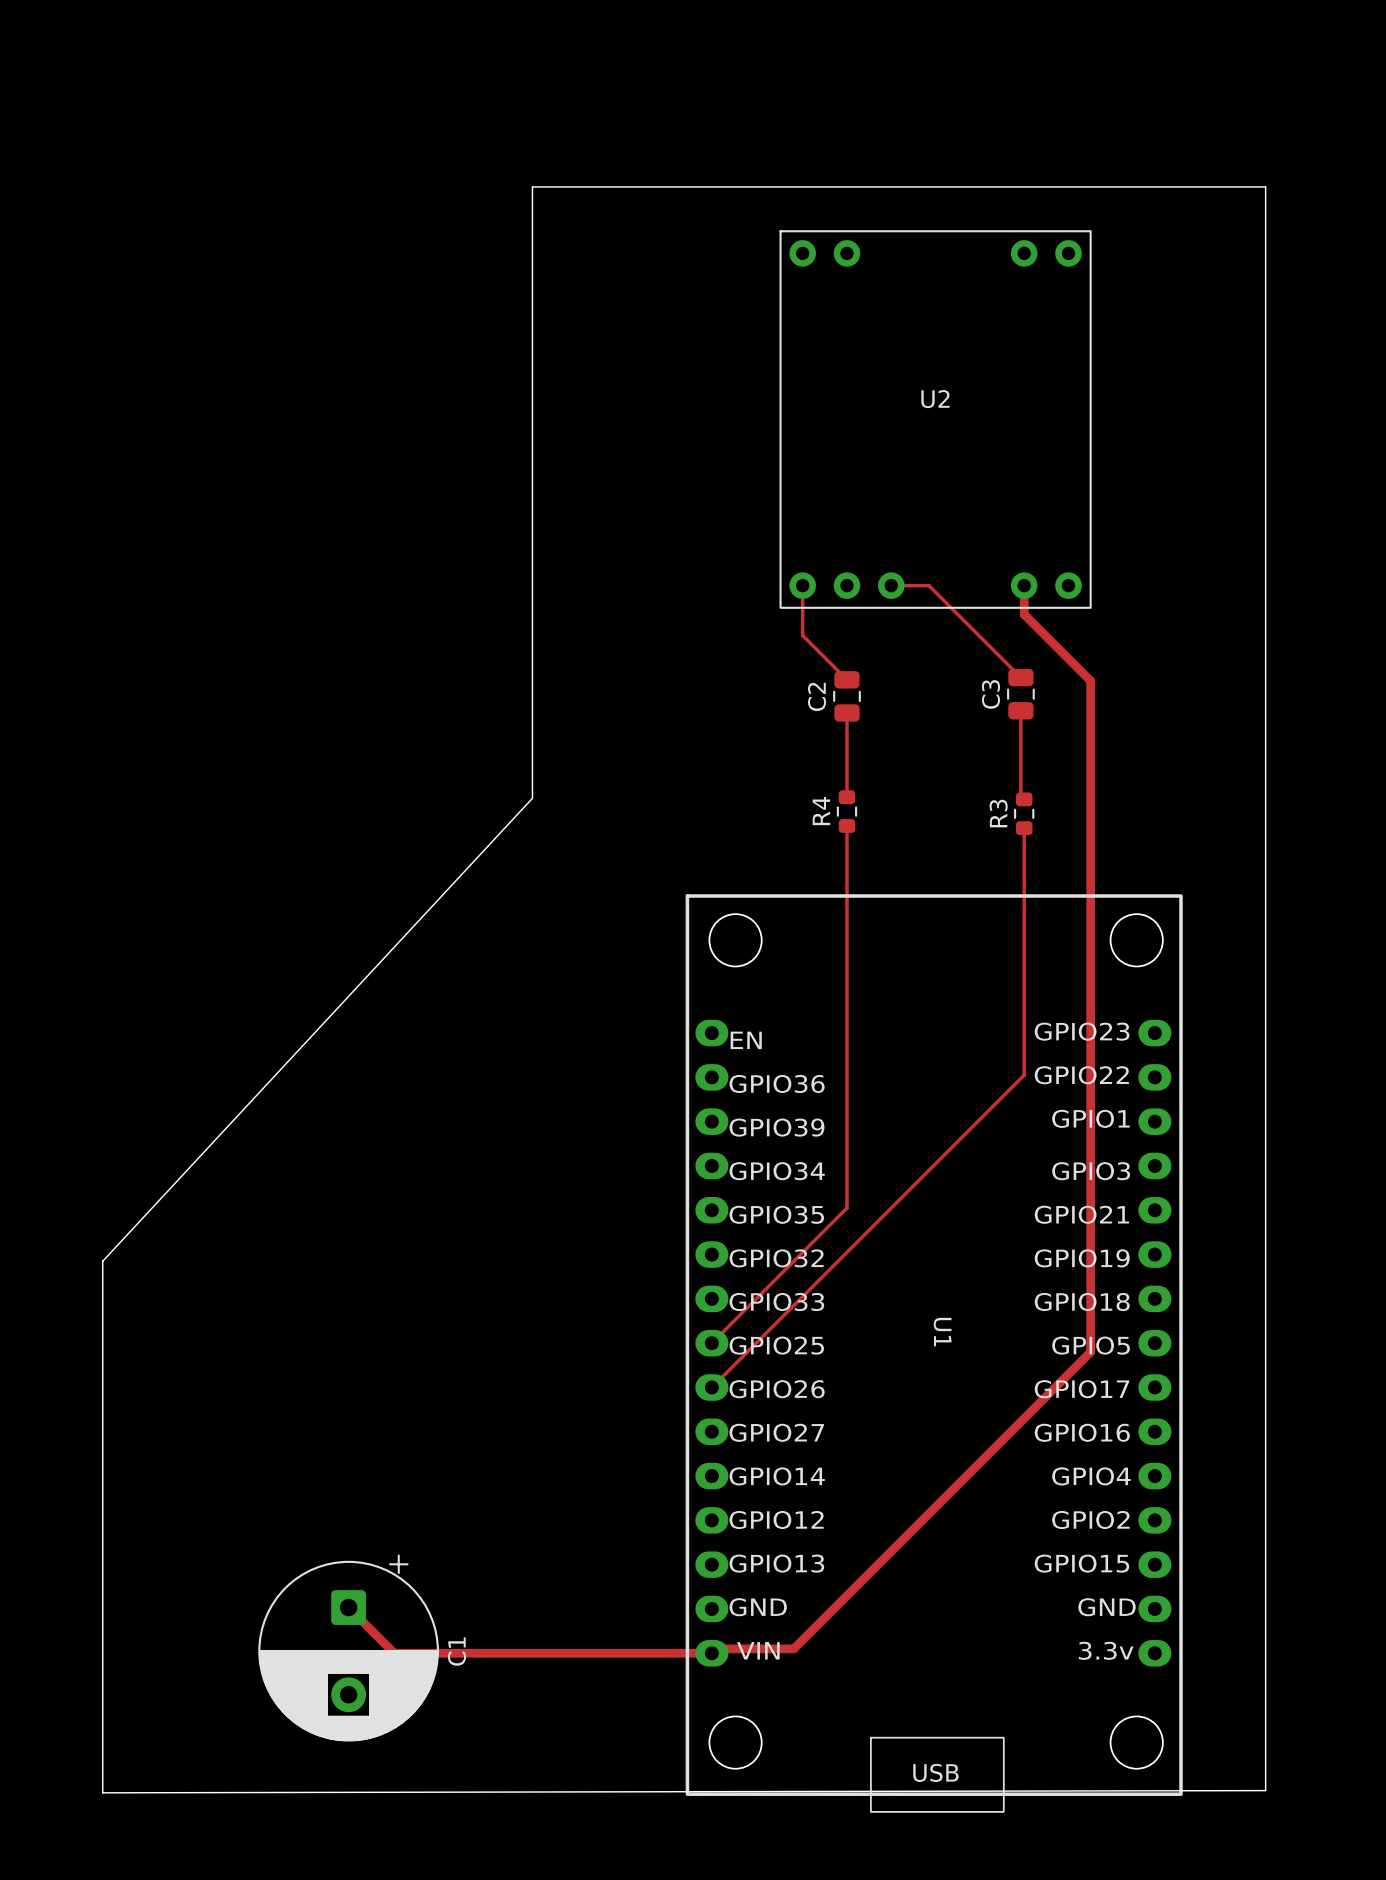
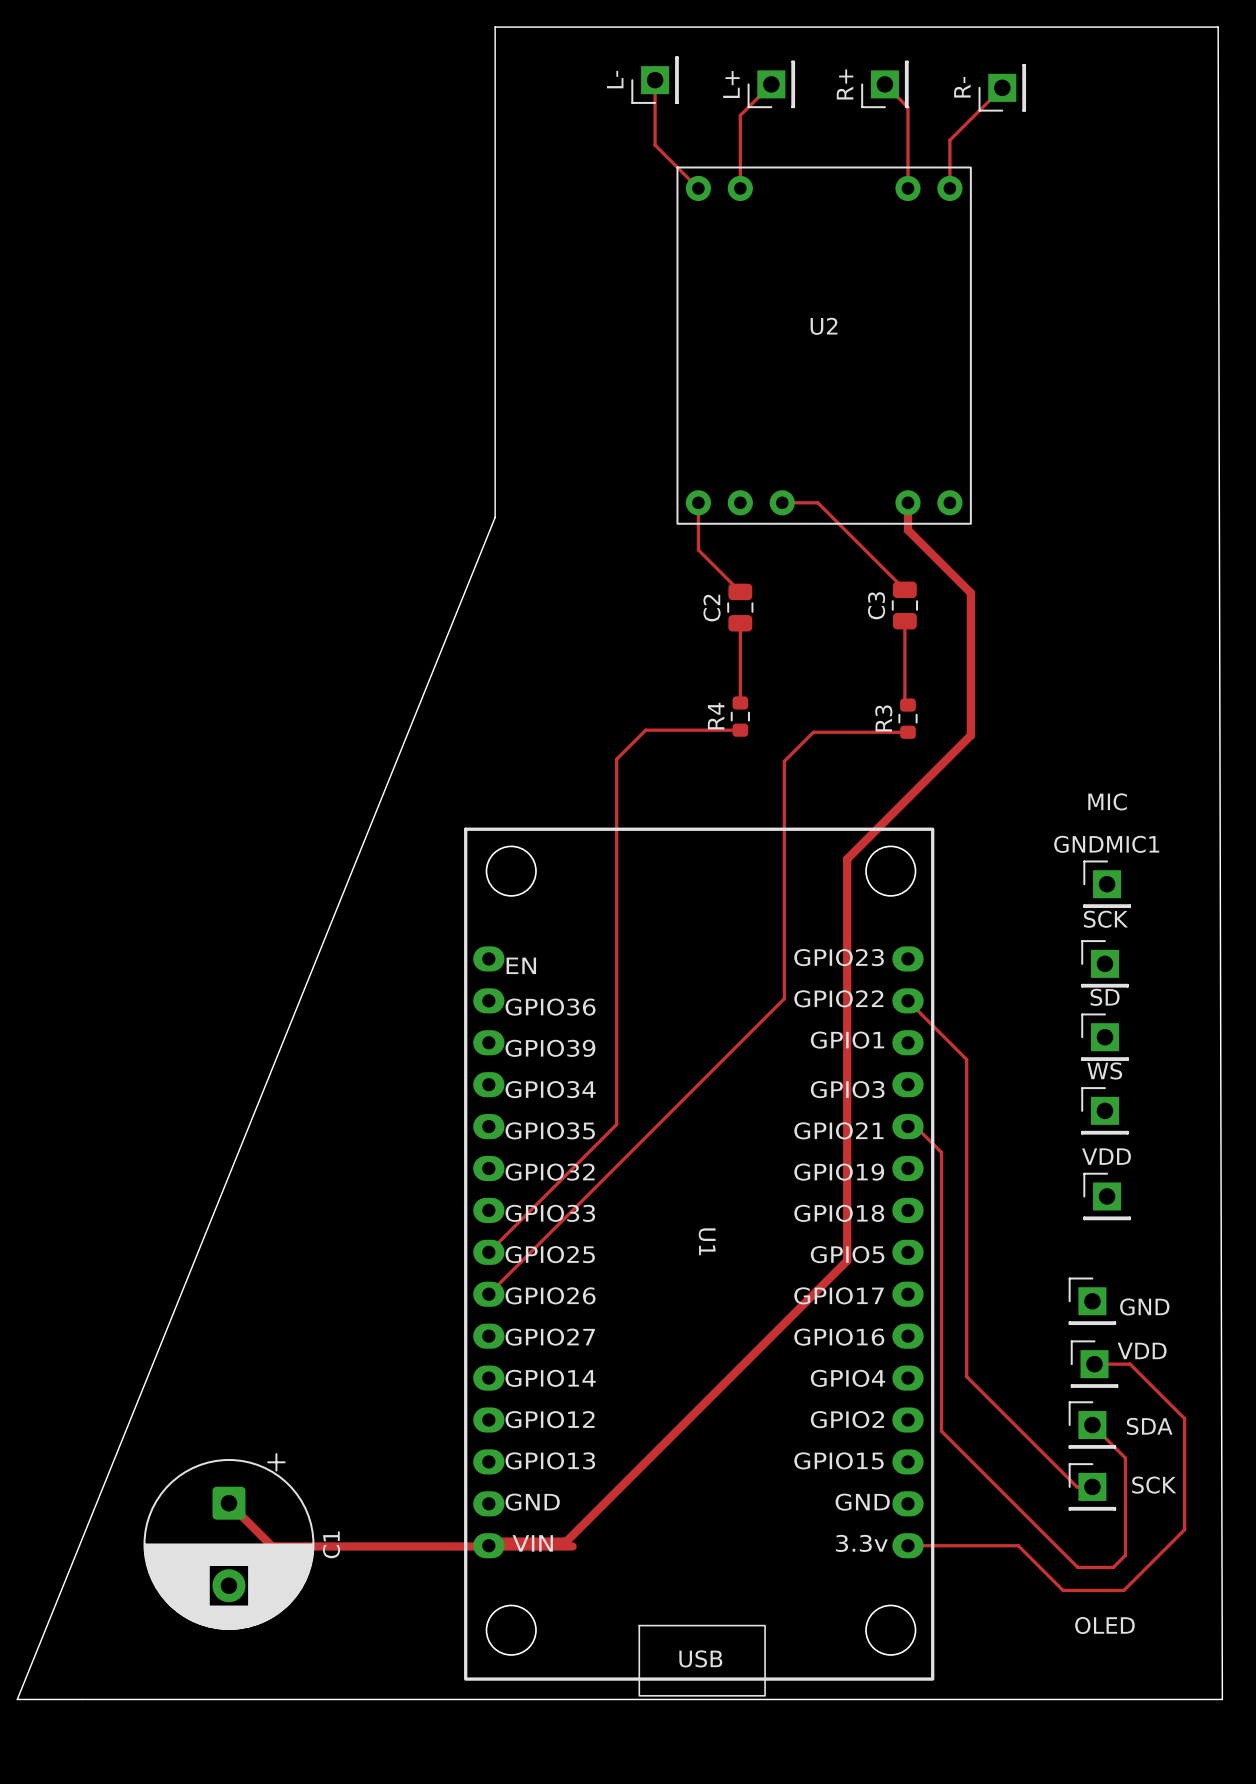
L-: none -> (655, 80)
track: none -> (657, 82) (655, 80) (655, 145) (698, 188)
track: none -> (771, 84) (740, 115) (740, 188)
L+: none -> (771, 84)
track: none -> (884, 84) (907, 107) (907, 188)
R+: none -> (884, 84)
track: none -> (1002, 87) (949, 140) (949, 188)
R-: none -> (1002, 87)
board edge: (532, 186) (1265, 186) (1265, 1790) (102, 1792) (102, 1261) (532, 798) (532, 186) -> (495, 27) (495, 517) (17, 1699) (1222, 1699) (1218, 27) (495, 27)
track: (847, 822) (847, 1208) (711, 1343) -> none
track: (1024, 824) (1024, 1075) (711, 1387) -> none
track: none -> (740, 730) (645, 730) (616, 759) (616, 1124) (488, 1252)
track: none -> (907, 732) (813, 732) (784, 761) (784, 998) (488, 1294)
track: (1090, 831) (1090, 1352) (793, 1648) (716, 1648) (711, 1653) (394, 1653) (348, 1607) -> (970, 735) (847, 859) (847, 1260) (566, 1541) (493, 1541) (488, 1545)
text: none -> MIC (1107, 801)
GNDMIC1: none -> (1107, 884)
SCK: none -> (1104, 963)
track: none -> (907, 1000) (966, 1059) (966, 1376) (1076, 1486) (1092, 1486)
SD: none -> (1104, 1037)
WS: none -> (1104, 1110)
track: none -> (907, 1126) (915, 1126) (941, 1152) (941, 1431) (1077, 1567) (1113, 1567) (1125, 1555) (1125, 1458) (1092, 1425)
VDD: none -> (1107, 1196)
U1 position: (934, 1353) -> (699, 1262)
GND: none -> (1092, 1301)
track: none -> (1094, 1364) (1130, 1364) (1184, 1418) (1184, 1529) (1123, 1590) (1063, 1590) (1018, 1545) (907, 1545)
VDD: none -> (1094, 1364)
SDA: none -> (1092, 1425)
SCK: none -> (1092, 1486)
track: none -> (228, 1503) (272, 1546) (572, 1546)
C1 position: (348, 1648) -> (228, 1541)
text: none -> OLED (1104, 1625)

